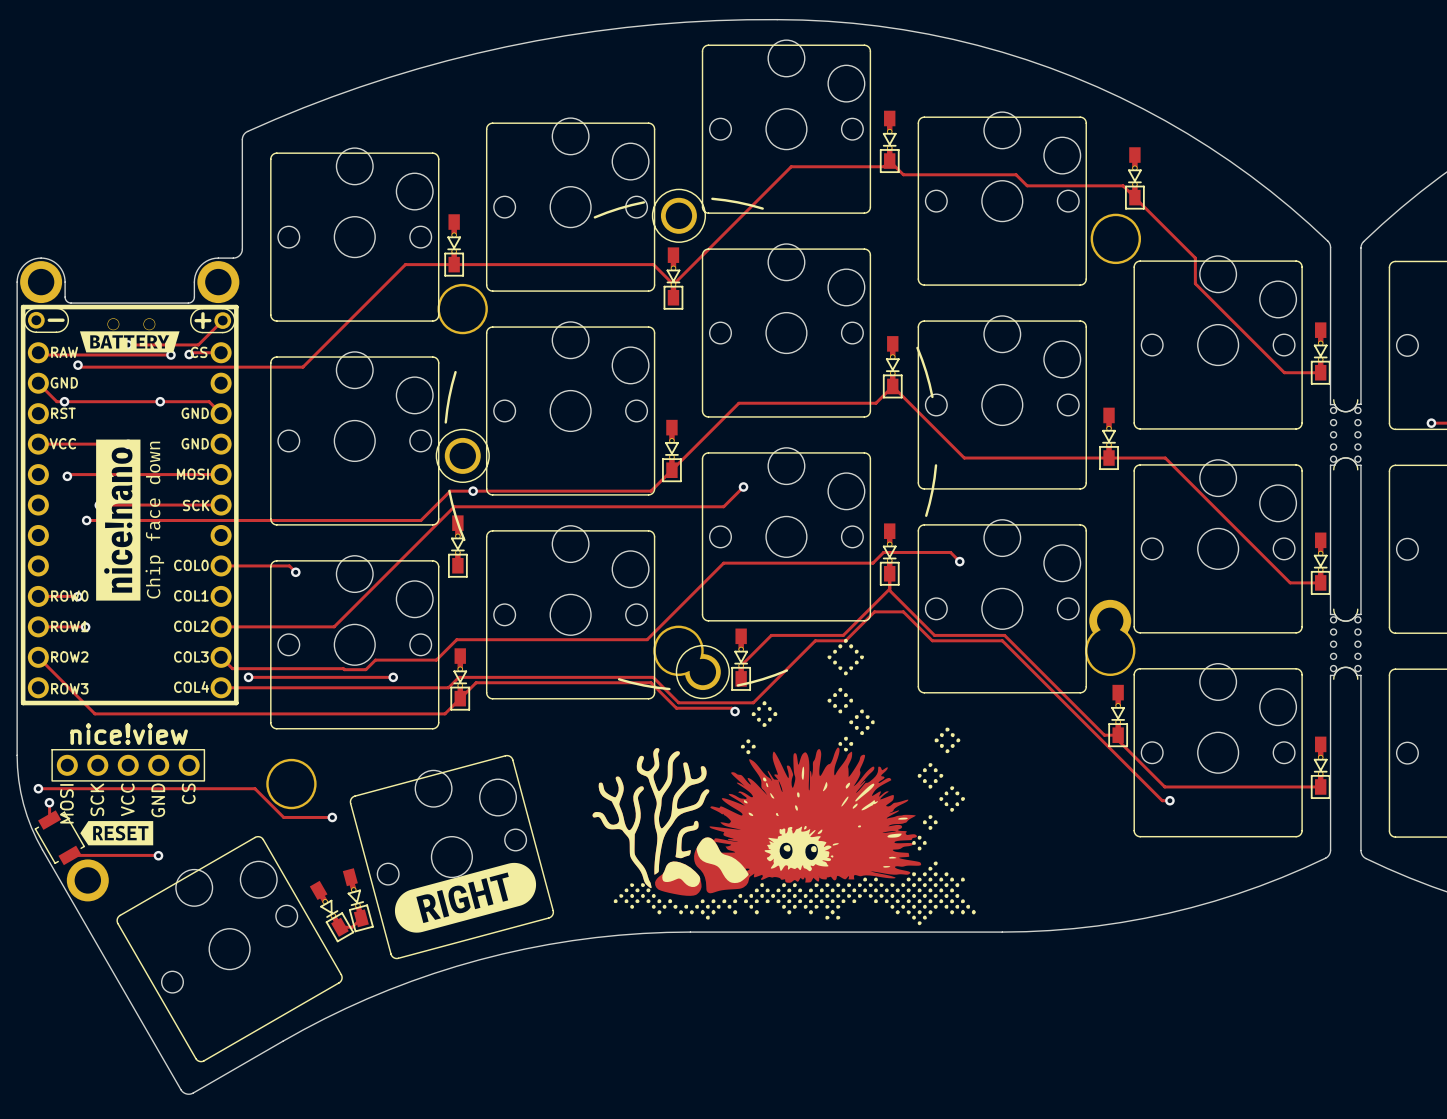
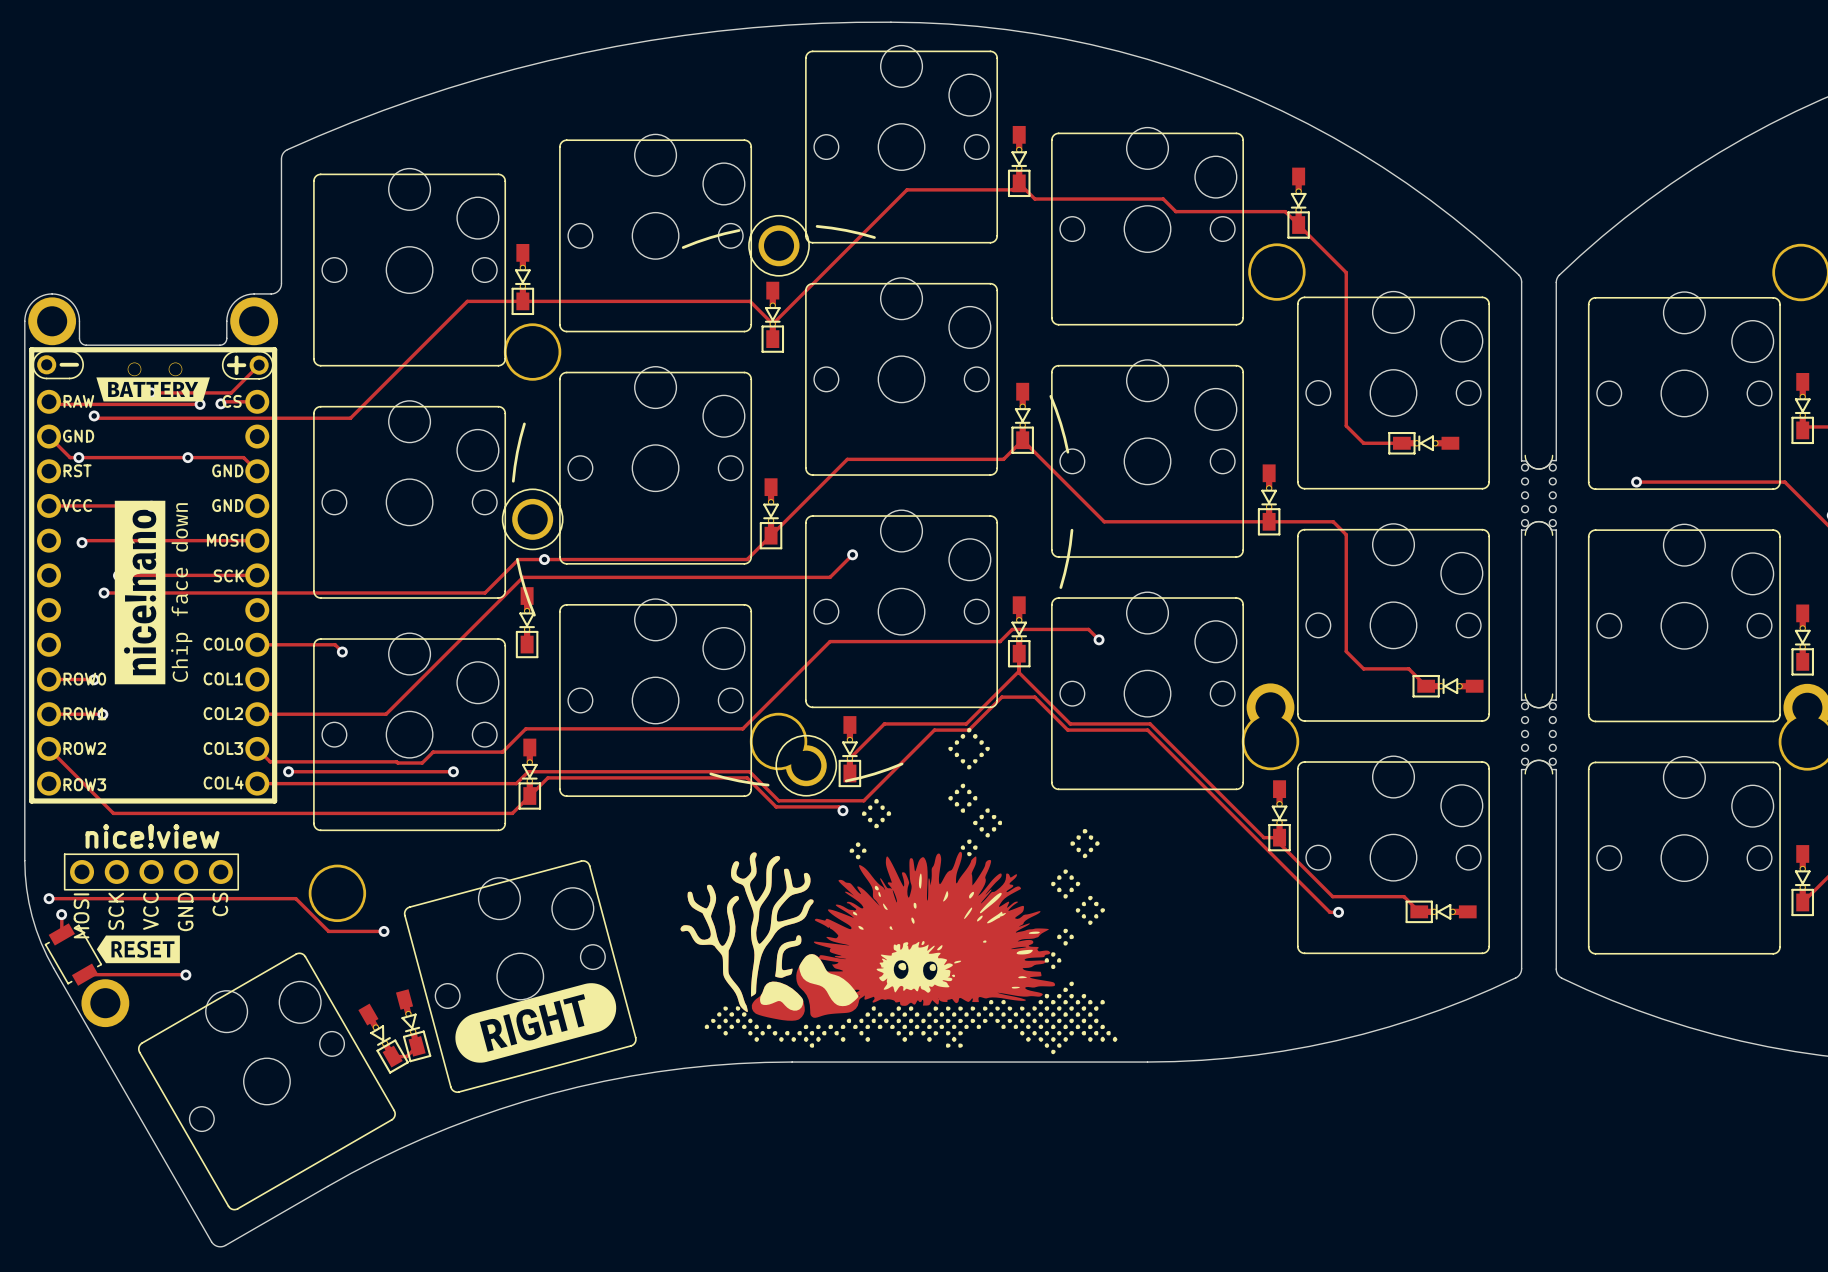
track: (1176, 239) (1195, 258) (1195, 283) (1284, 372) (1320, 372) -> (1346, 272) (1346, 425) (1363, 443) (1398, 443)
part rotation: 0° (1320, 353) -> 90° clockwise (1423, 443)
part position: (1320, 353) -> (1423, 443)
track: (1176, 469) (1290, 582) (1320, 582) -> (1346, 534) (1346, 651) (1363, 668) (1408, 668) (1426, 686)
part rotation: 0° (1320, 563) -> 90° clockwise (1448, 686)
part position: (1320, 563) -> (1448, 686)
part rotation: 0° (1320, 767) -> 90° clockwise (1441, 911)
part position: (1320, 767) -> (1441, 911)
track: (1227, 786) (1320, 786) -> (1404, 896) (1419, 911)

